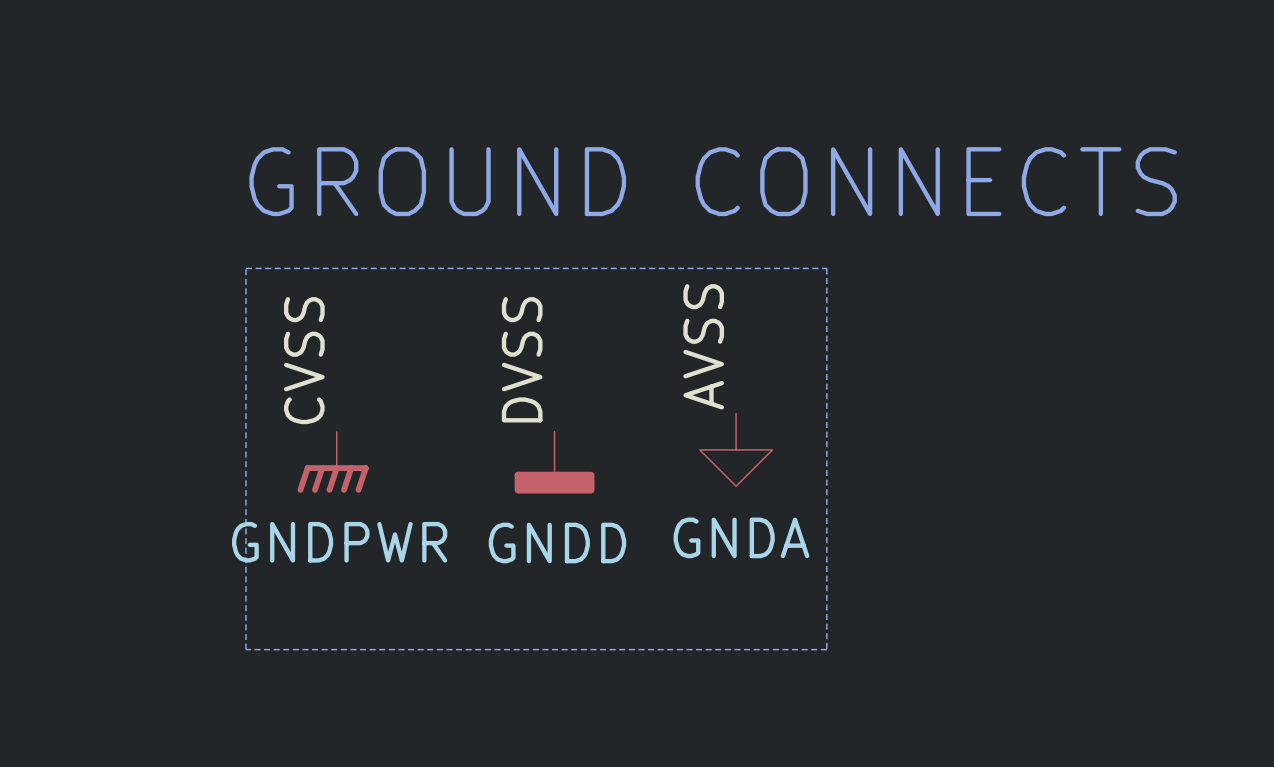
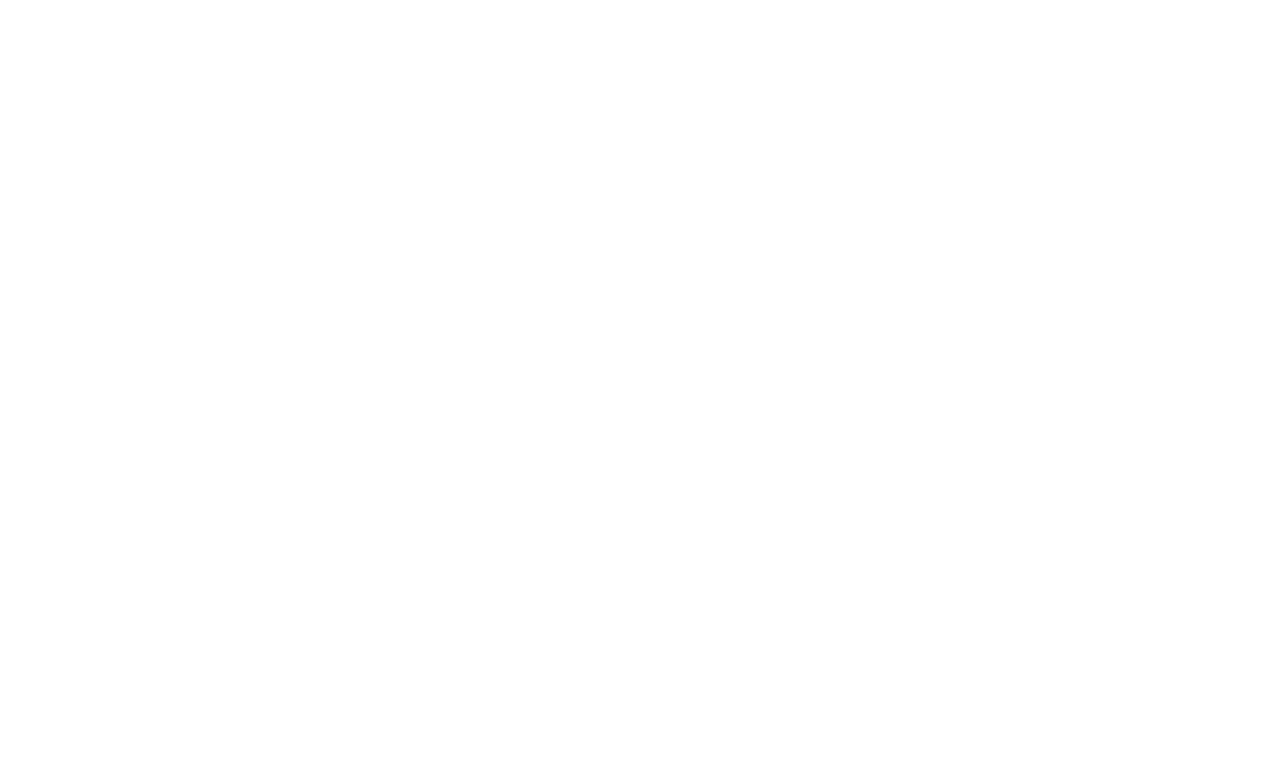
text: GROUND CONNECTS (713, 181) -> none
line: (245, 268) (826, 268) (826, 649) (245, 649) (245, 268) -> none
label: AVSS (703, 346) -> none
label: DVSS (522, 359) -> none
label: CVSS (304, 360) -> none
power symbol: GNDA (736, 449) -> none
power symbol: GNDPWR (333, 462) -> none
power symbol: GNDD (554, 462) -> none

